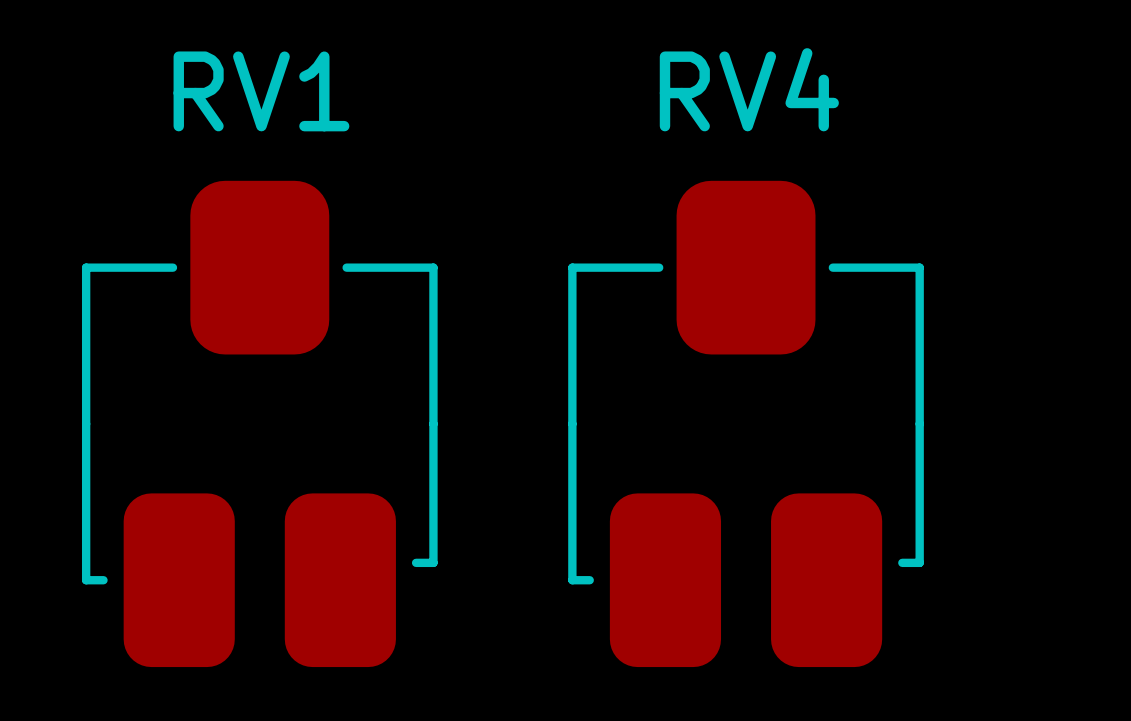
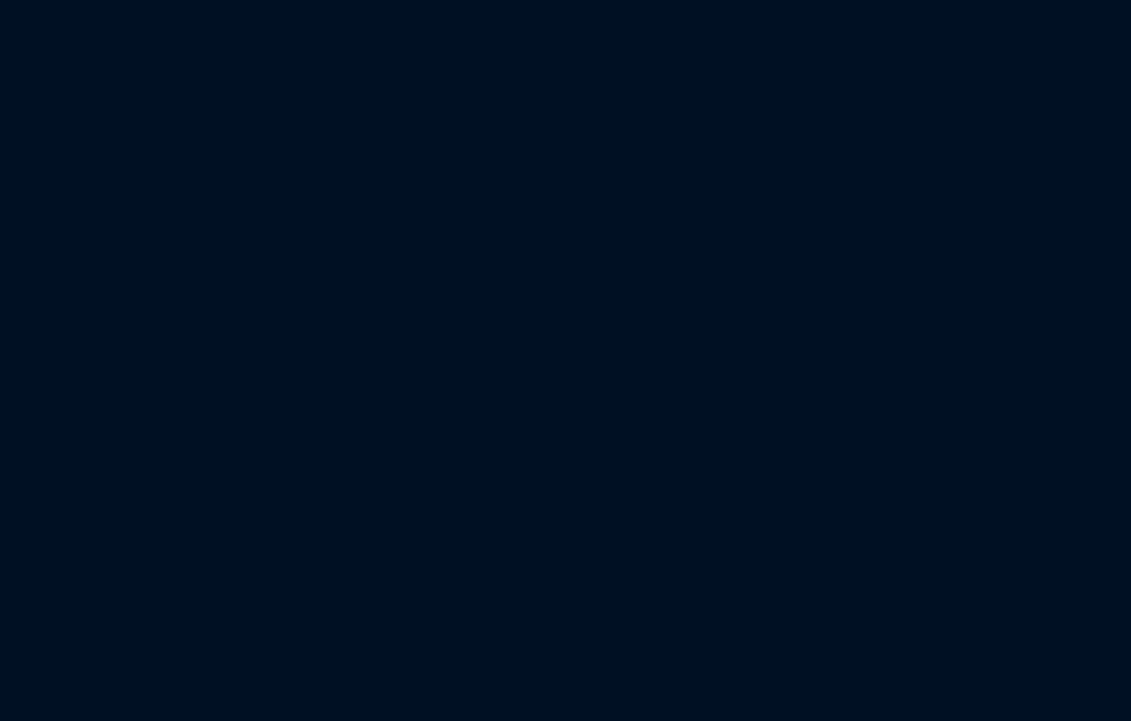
RV1: (259, 423) -> none
RV4: (746, 423) -> none

